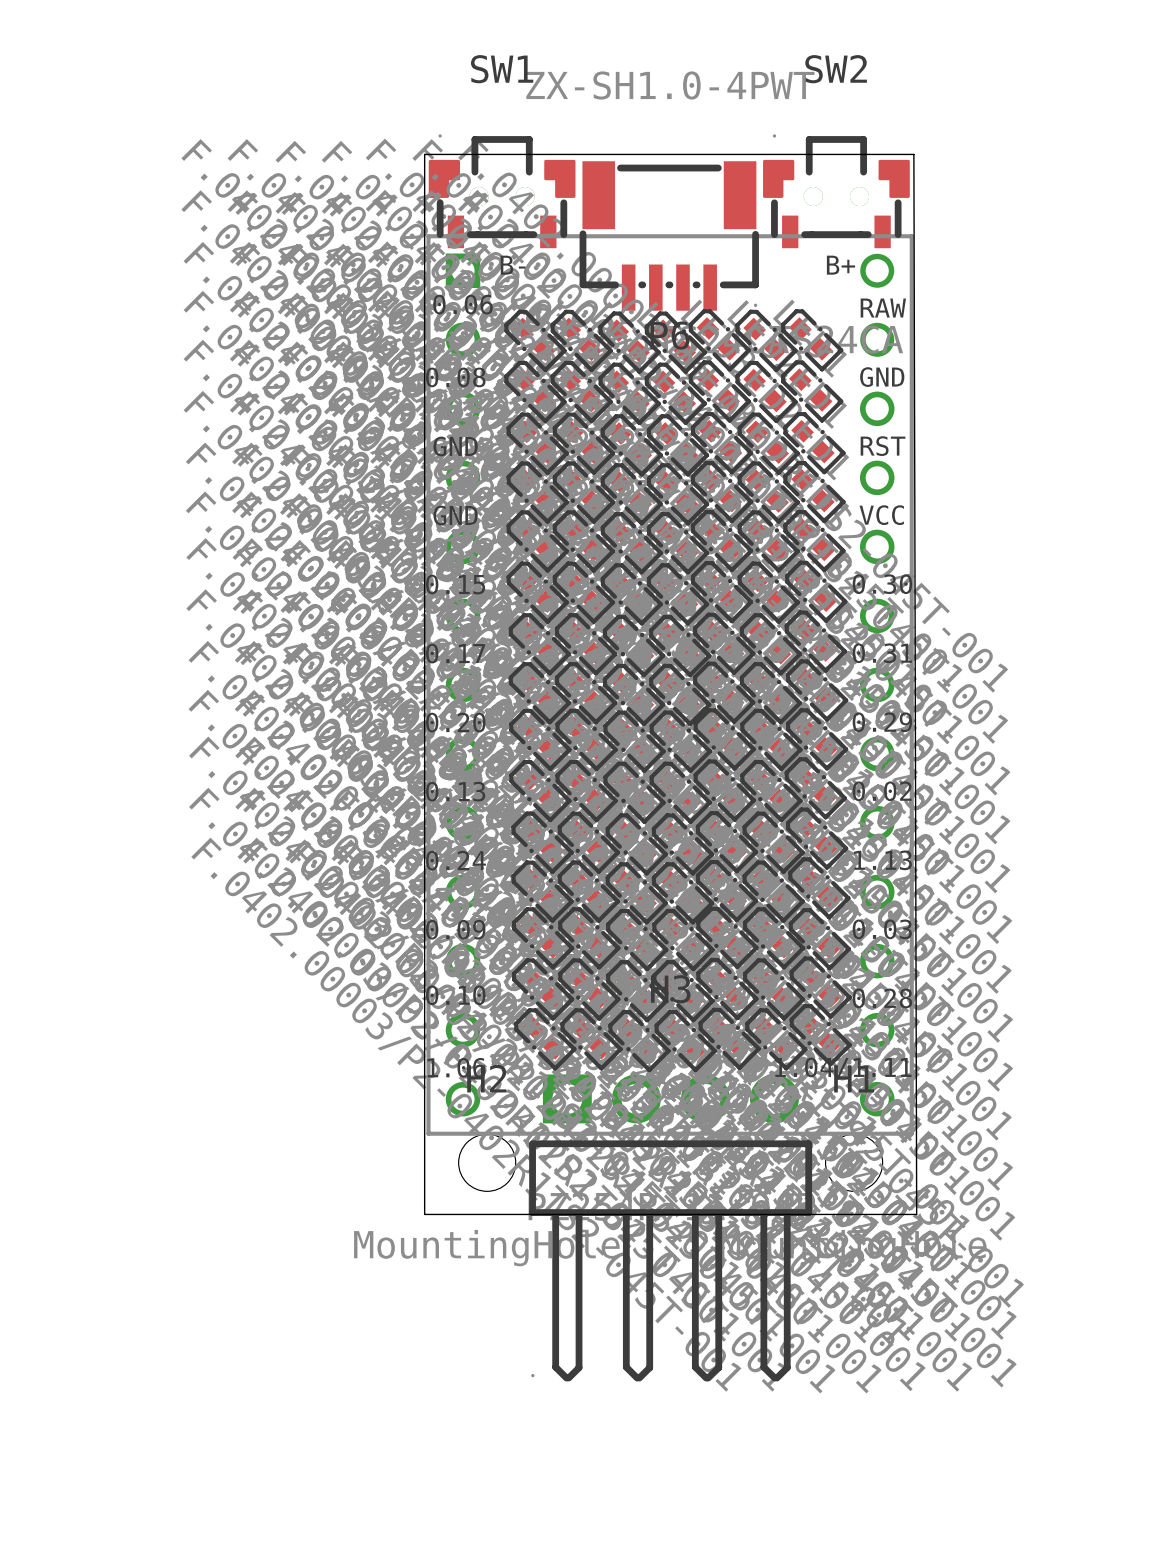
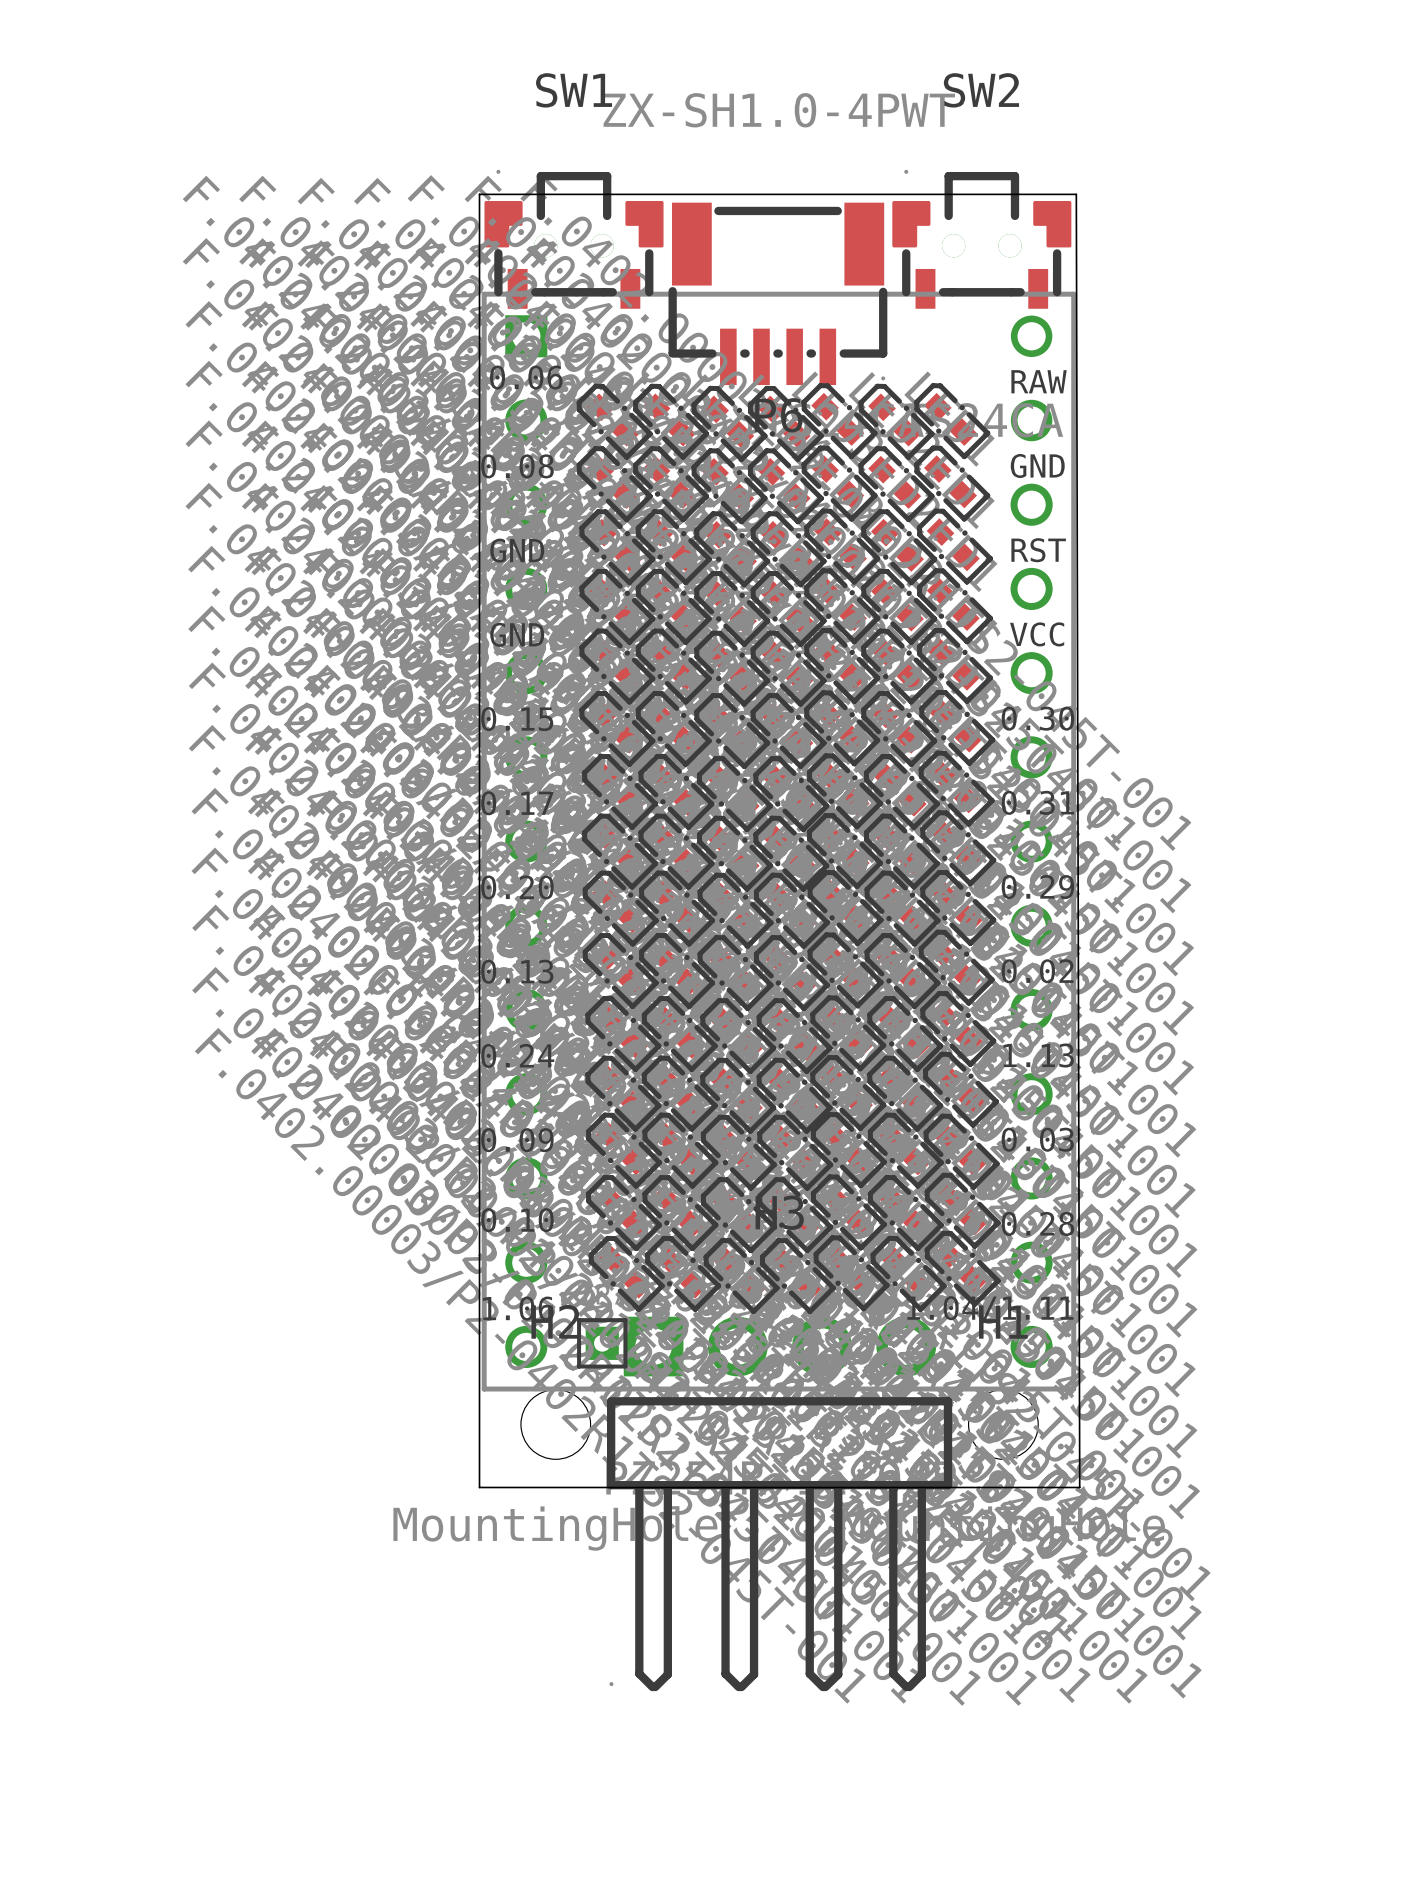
text: B- (513, 265) -> none
text: B+ (841, 265) -> none
part: none -> (602, 1343)

